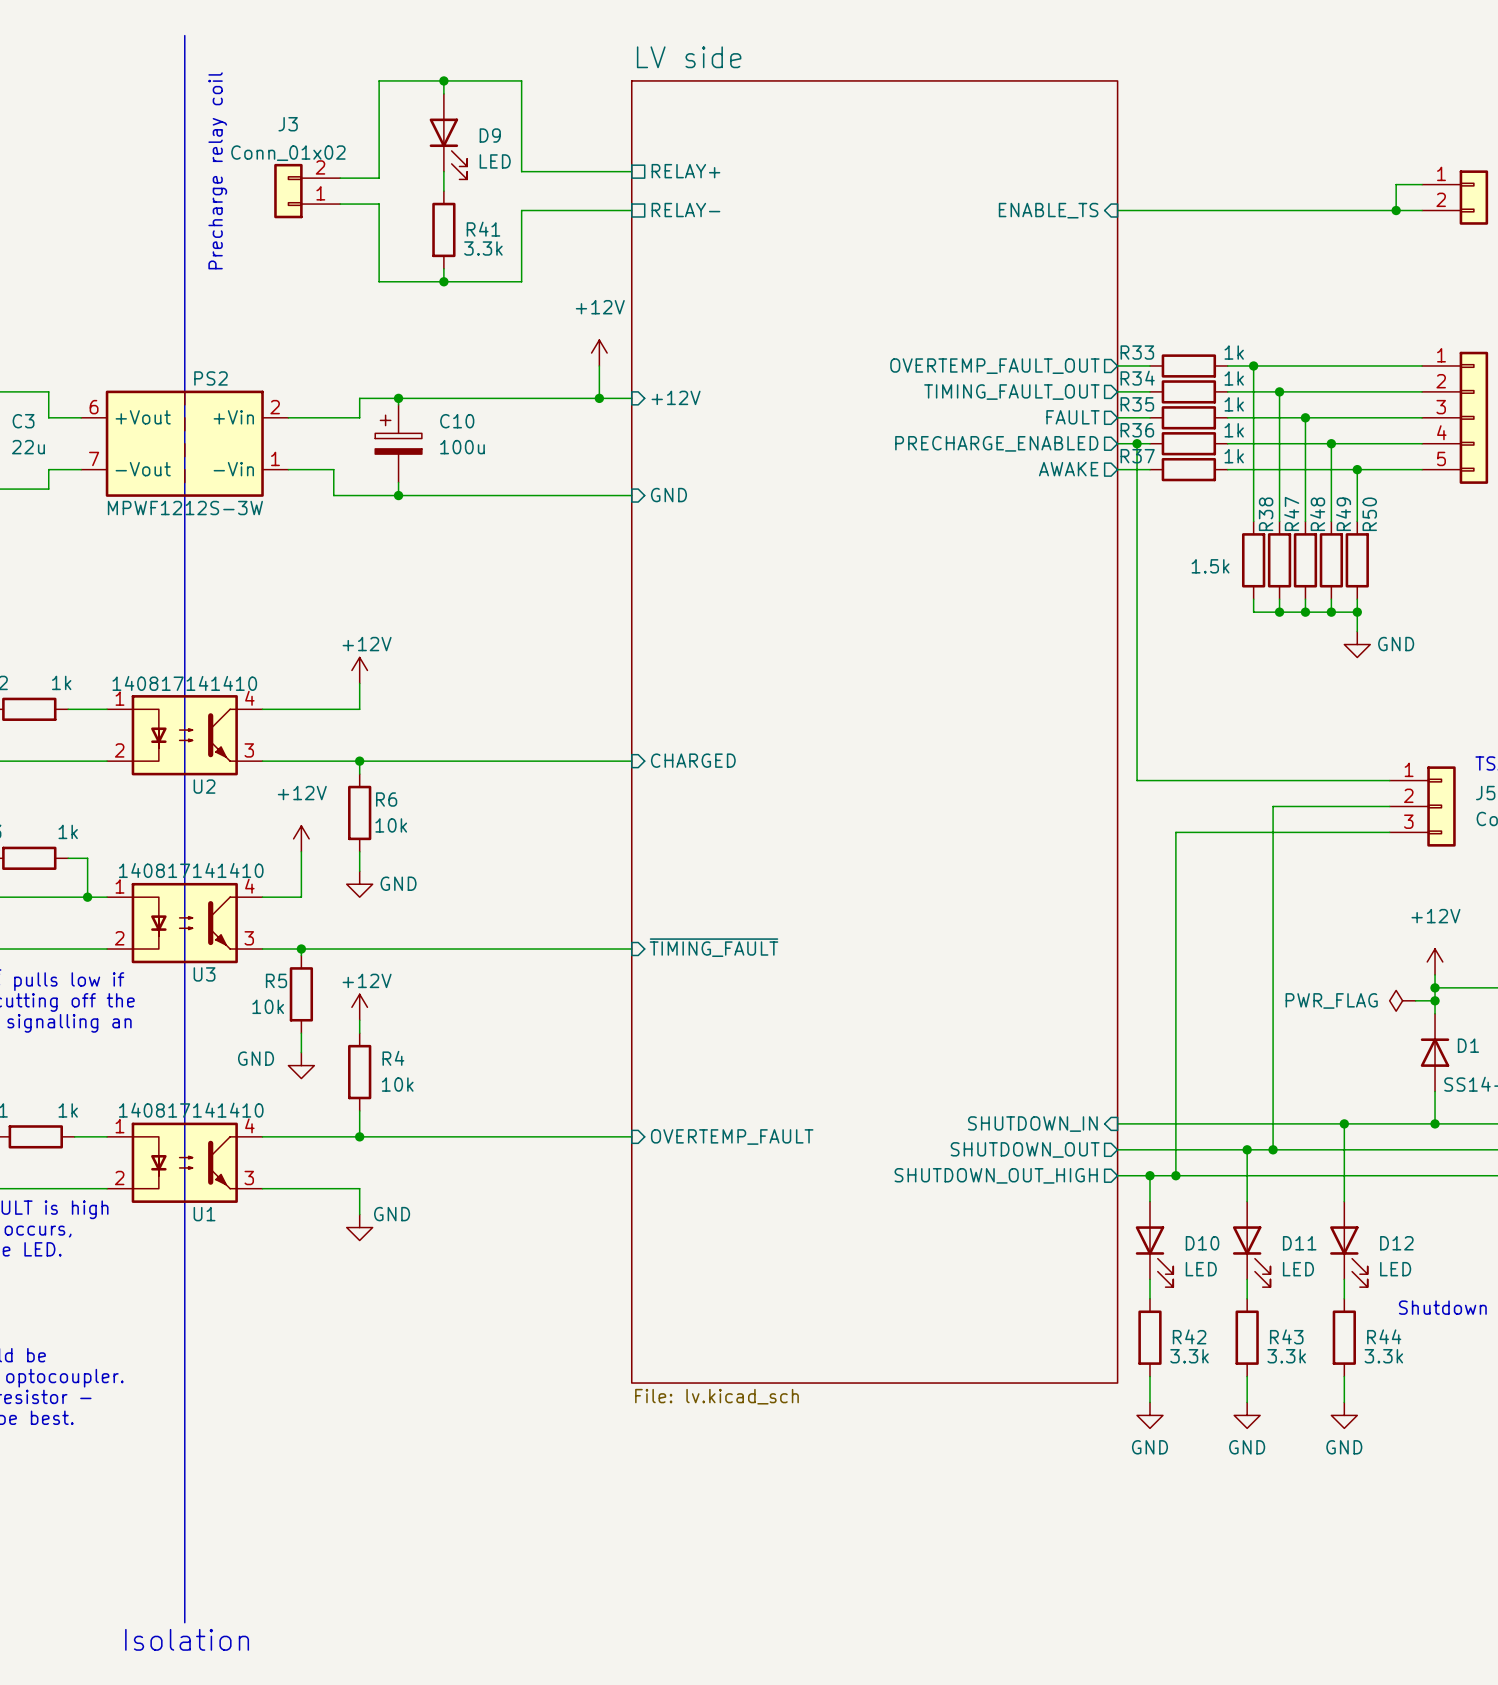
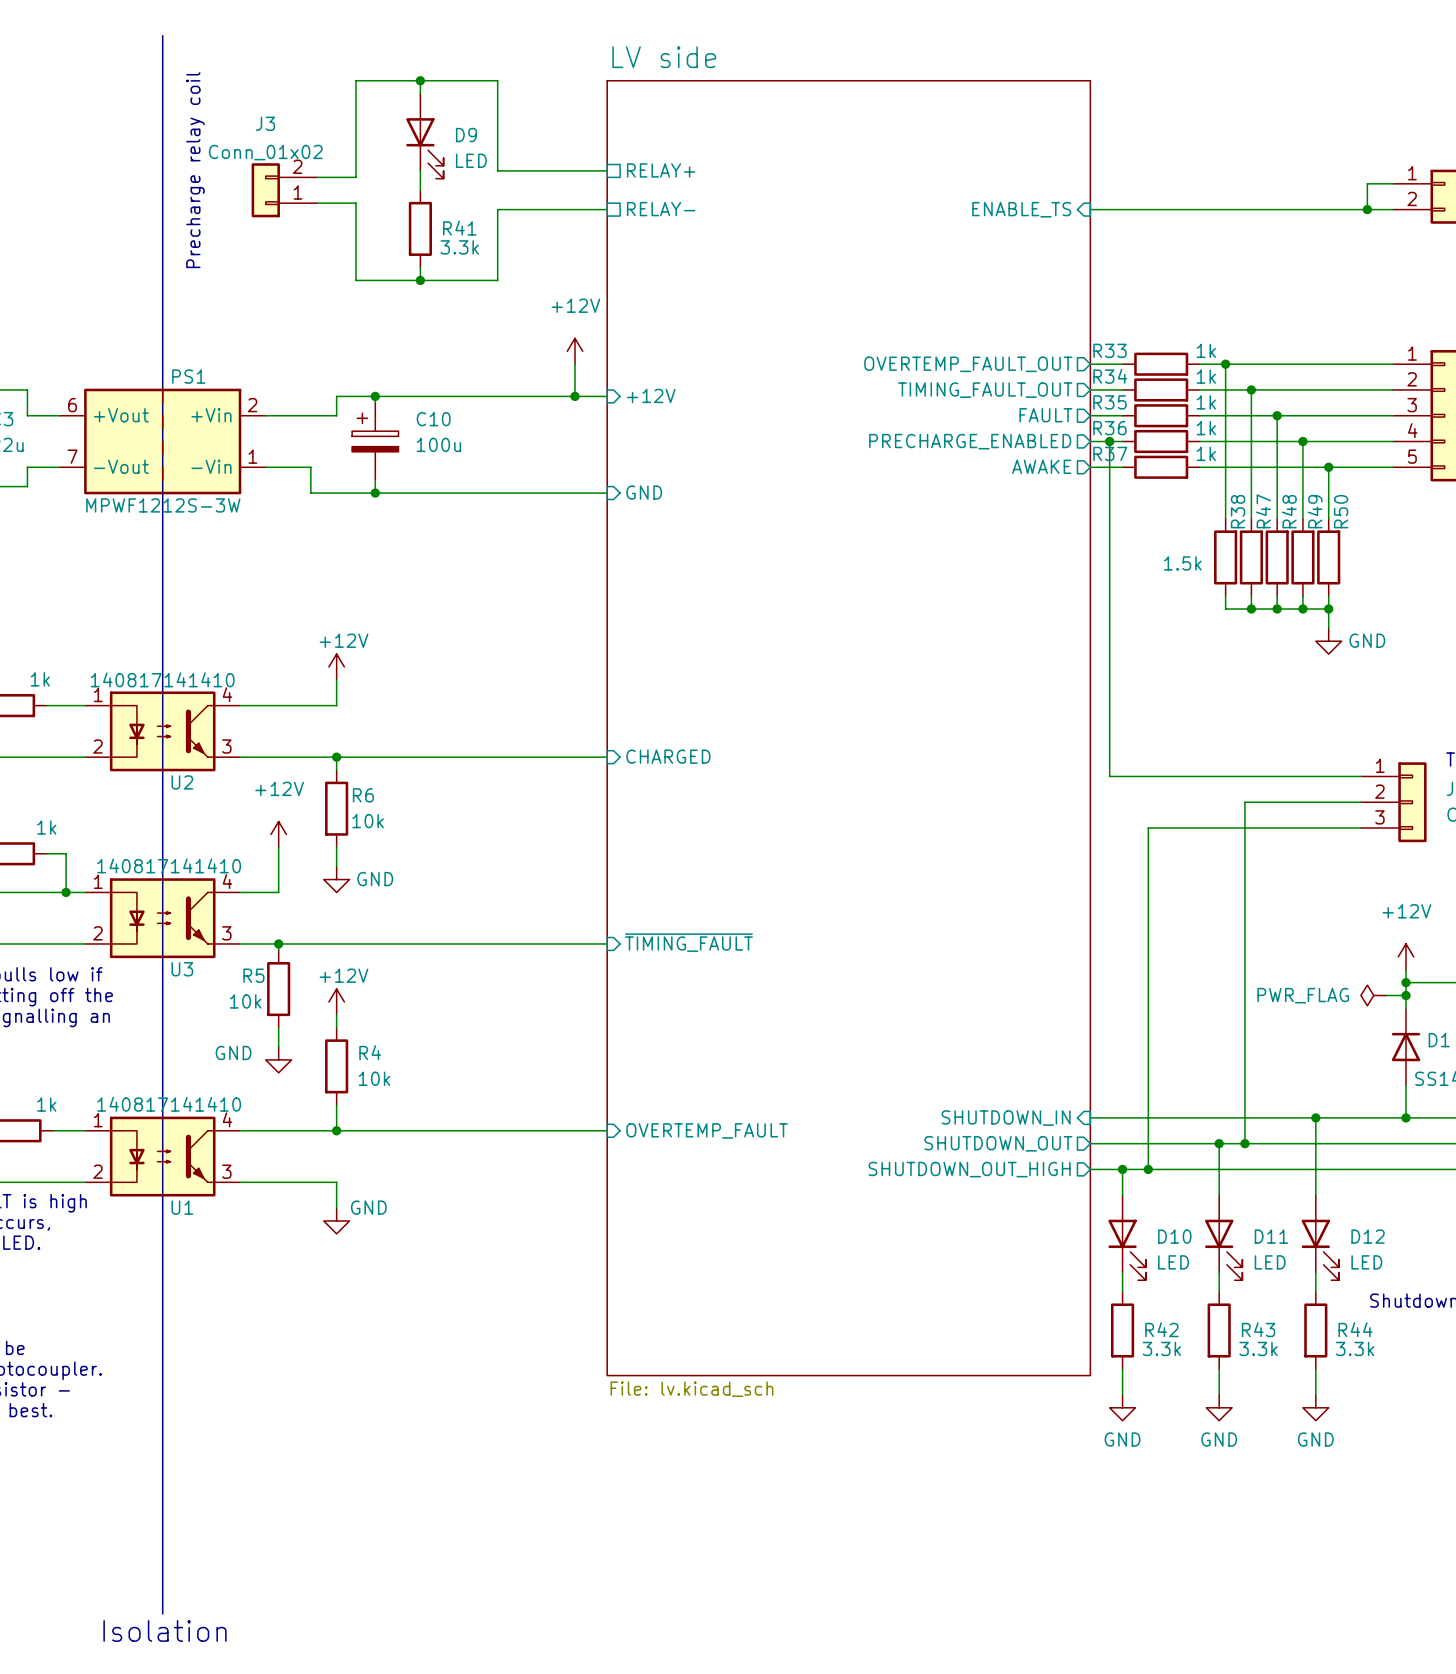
PS2 name: PS2 (211, 378) -> PS1 (188, 376)

